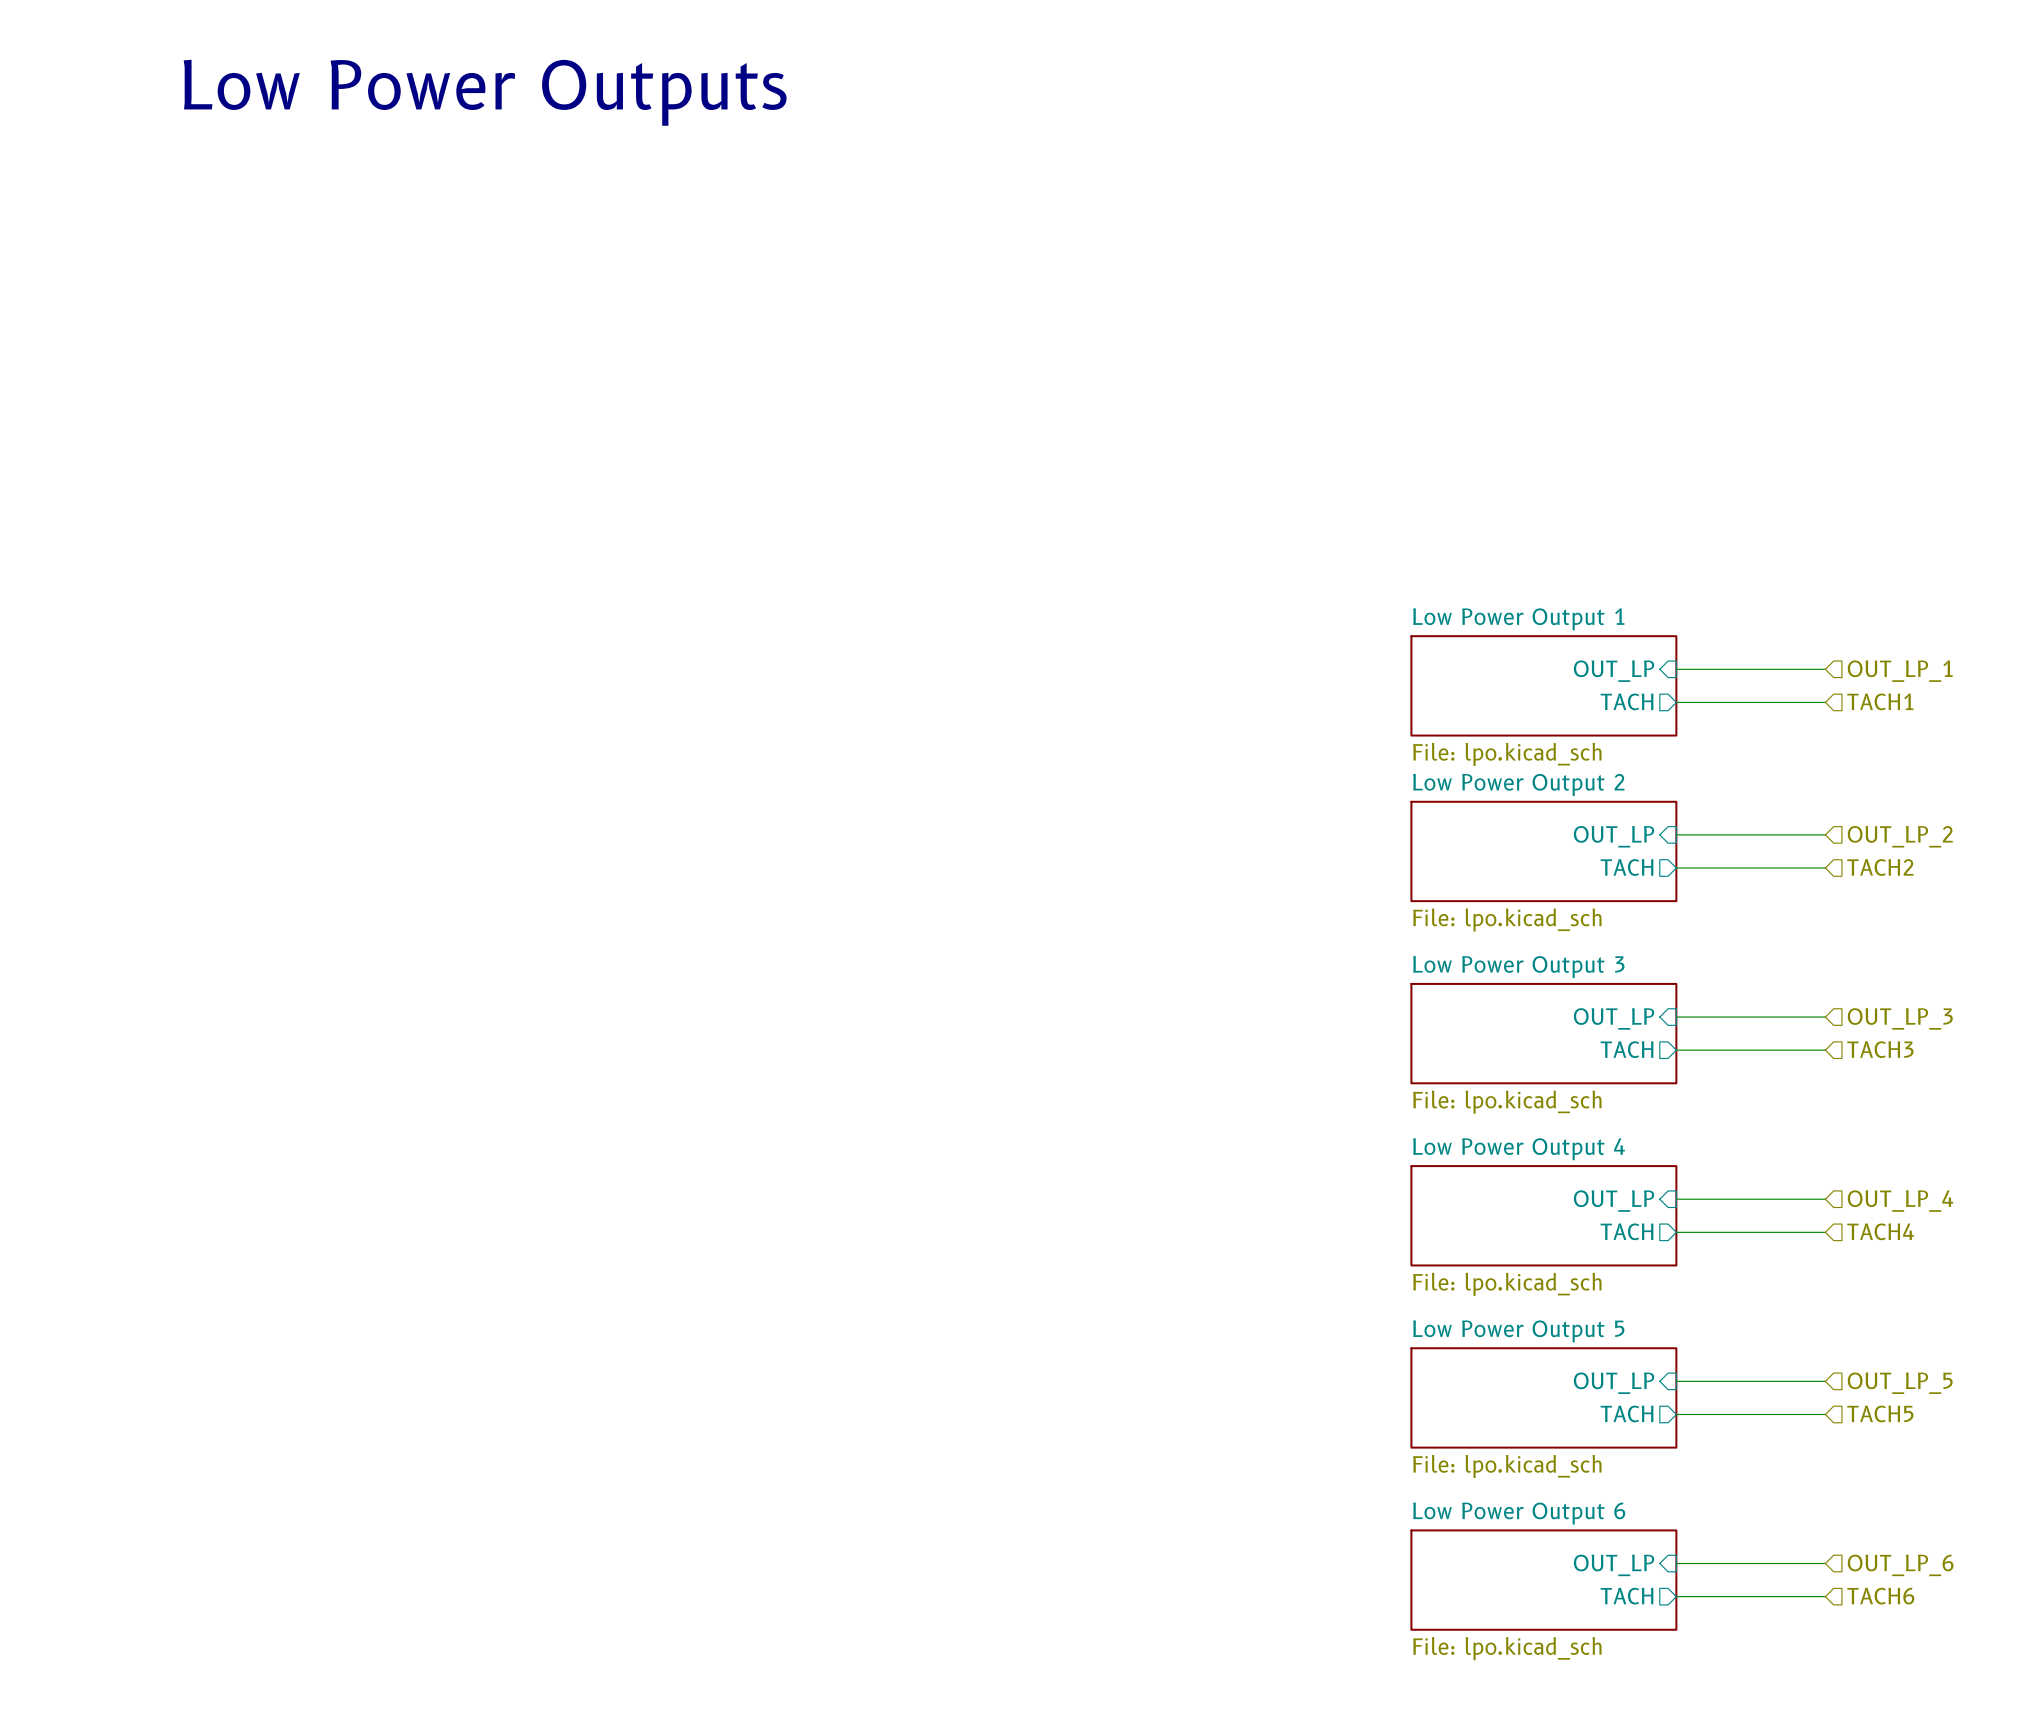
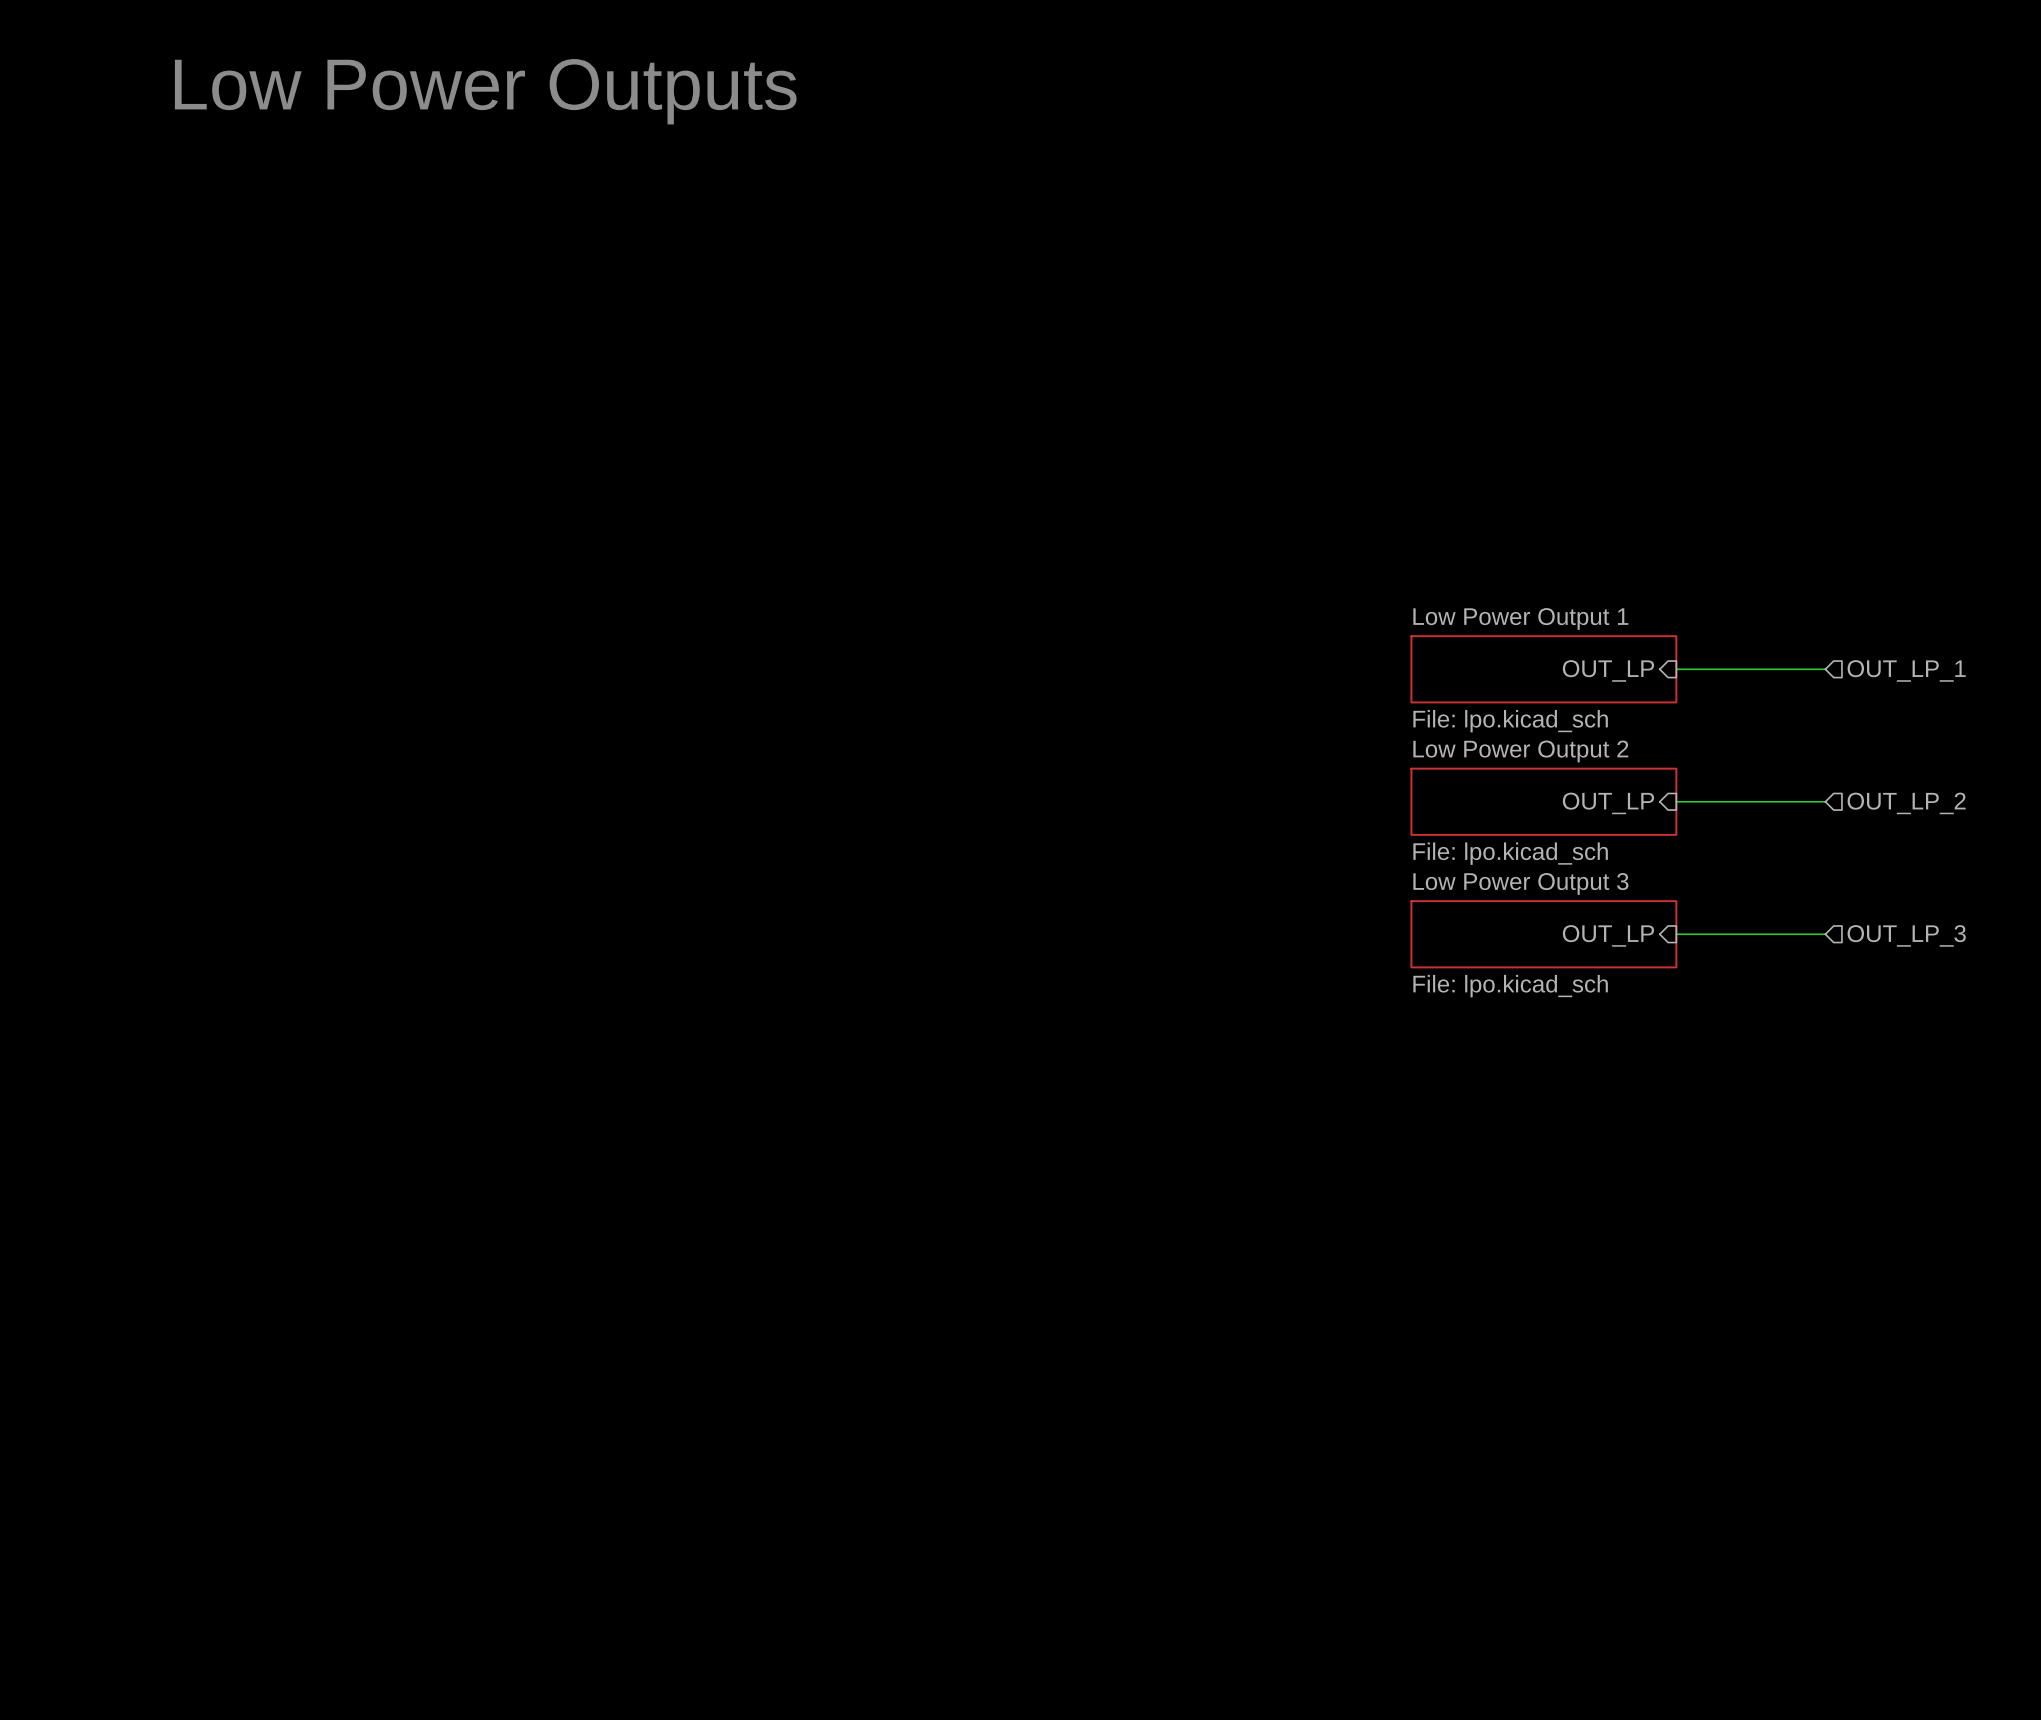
sheet Low Power Output 1 shape: [1410, 635, 1678, 737] -> [1410, 635, 1678, 704]
sheet pin: TACH (1627, 701) -> none
hierarchical label: TACH1 (1880, 701) -> none
wire: (1676, 702) (1825, 702) -> (1676, 801) (1825, 801)
sheet Low Power Output 2 shape: [1410, 800, 1678, 903] -> [1410, 767, 1678, 836]
wire: (1676, 834) (1825, 834) -> (1676, 934) (1825, 934)
sheet pin position: OUT_LP (1614, 836) -> OUT_LP (1608, 803)
hierarchical label position: OUT_LP_2 (1900, 836) -> OUT_LP_2 (1906, 803)
sheet pin: TACH (1627, 867) -> none
hierarchical label: TACH2 (1880, 867) -> none
wire: (1676, 868) (1825, 868) -> none
sheet pin: none -> OUT_LP (1608, 935)
sheet Low Power Output 3 shape: [1410, 982, 1678, 1085] -> [1410, 900, 1678, 969]
wire: (1676, 1017) (1825, 1017) -> none
sheet pin: OUT_LP (1614, 1018) -> none
hierarchical label position: OUT_LP_3 (1900, 1018) -> OUT_LP_3 (1906, 935)
sheet pin: TACH (1627, 1049) -> none
hierarchical label: TACH3 (1880, 1049) -> none
wire: (1676, 1050) (1825, 1050) -> none
wire: (1676, 1199) (1825, 1199) -> none
sheet pin: OUT_LP (1614, 1201) -> none
hierarchical label: OUT_LP_4 (1900, 1201) -> none
sheet Low Power Output 4: File: lpo.kicad_sch (1543, 1215) -> none
sheet pin: TACH (1627, 1231) -> none
hierarchical label: TACH4 (1880, 1231) -> none
wire: (1676, 1232) (1825, 1232) -> none
wire: (1676, 1381) (1825, 1381) -> none
sheet pin: OUT_LP (1614, 1383) -> none
hierarchical label: OUT_LP_5 (1900, 1383) -> none
sheet Low Power Output 5: File: lpo.kicad_sch (1543, 1397) -> none
sheet pin: TACH (1627, 1413) -> none
hierarchical label: TACH5 (1880, 1413) -> none
wire: (1676, 1414) (1825, 1414) -> none
wire: (1676, 1563) (1825, 1563) -> none
sheet pin: OUT_LP (1614, 1565) -> none
hierarchical label: OUT_LP_6 (1900, 1565) -> none
sheet Low Power Output 6: File: lpo.kicad_sch (1543, 1580) -> none
sheet pin: TACH (1627, 1596) -> none
wire: (1676, 1596) (1825, 1596) -> none
hierarchical label: TACH6 (1880, 1596) -> none

